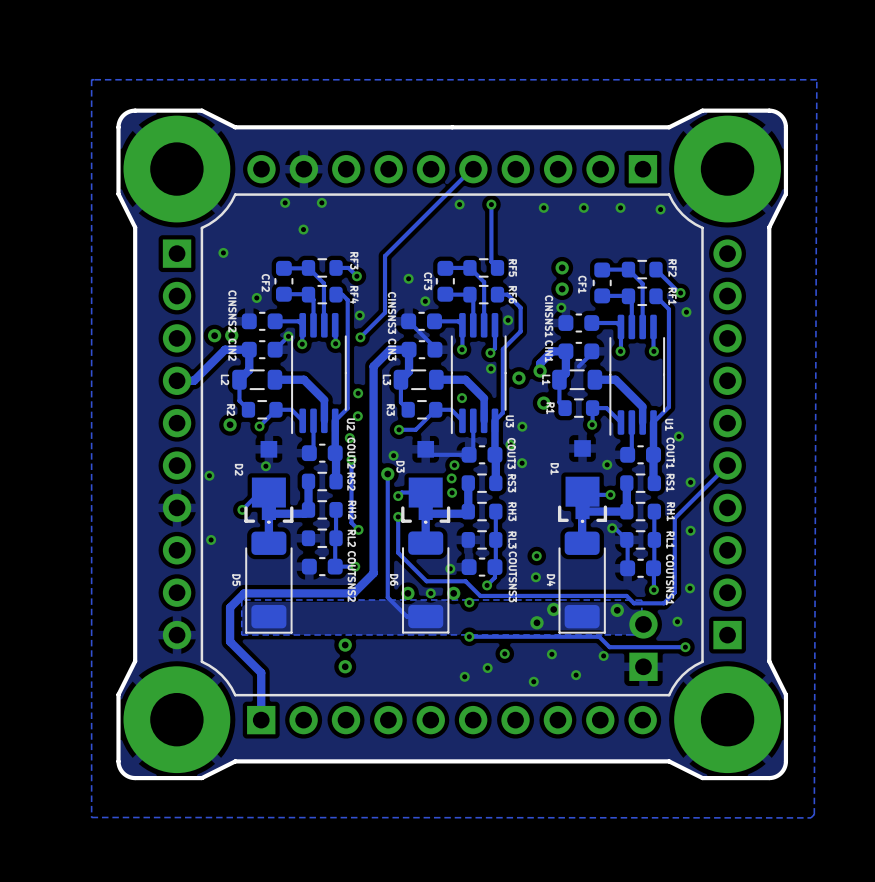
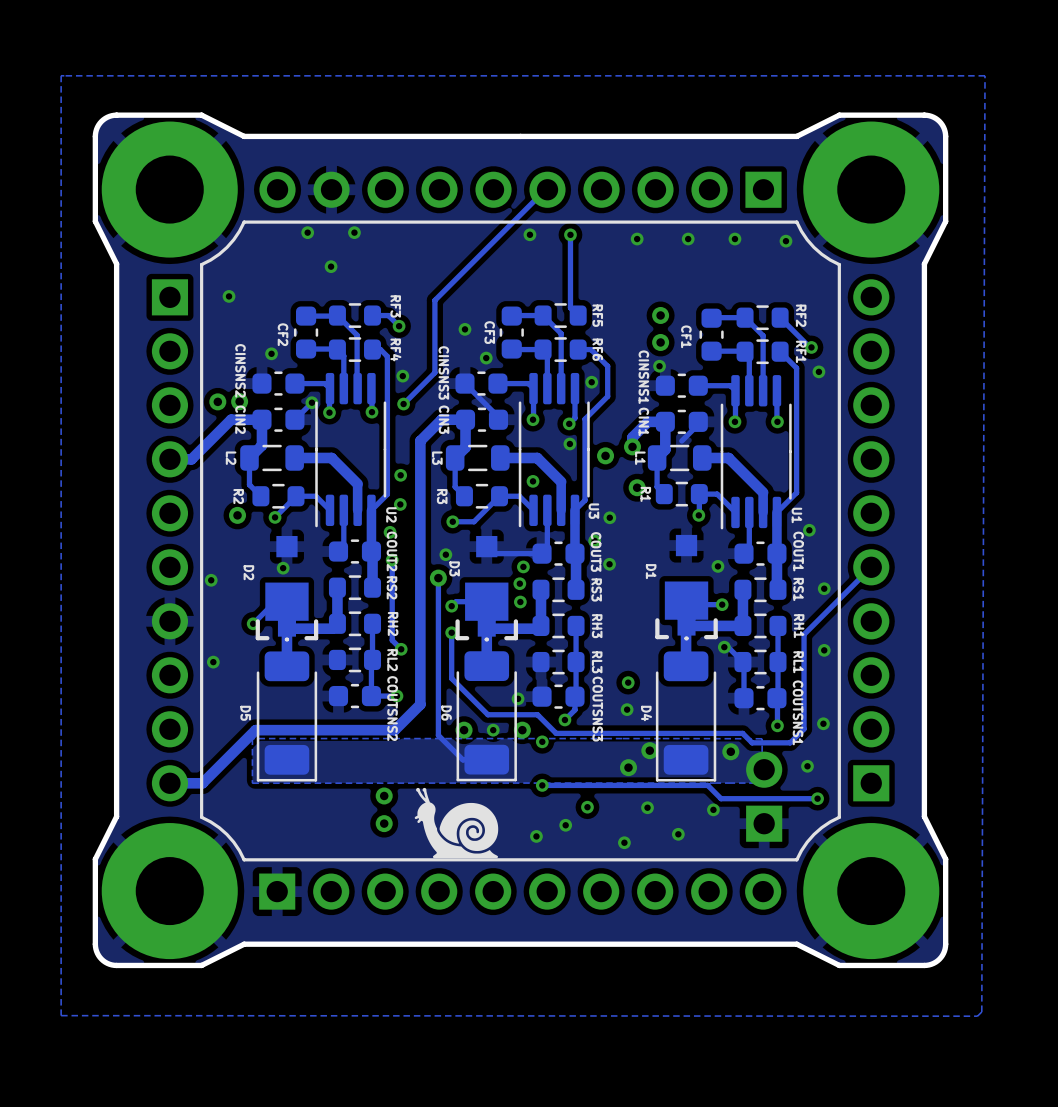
track: (230, 607) (230, 641) (261, 672) (261, 720) -> (237, 748) (202, 783) (169, 783)
drawing: none -> [414, 787, 499, 859]

